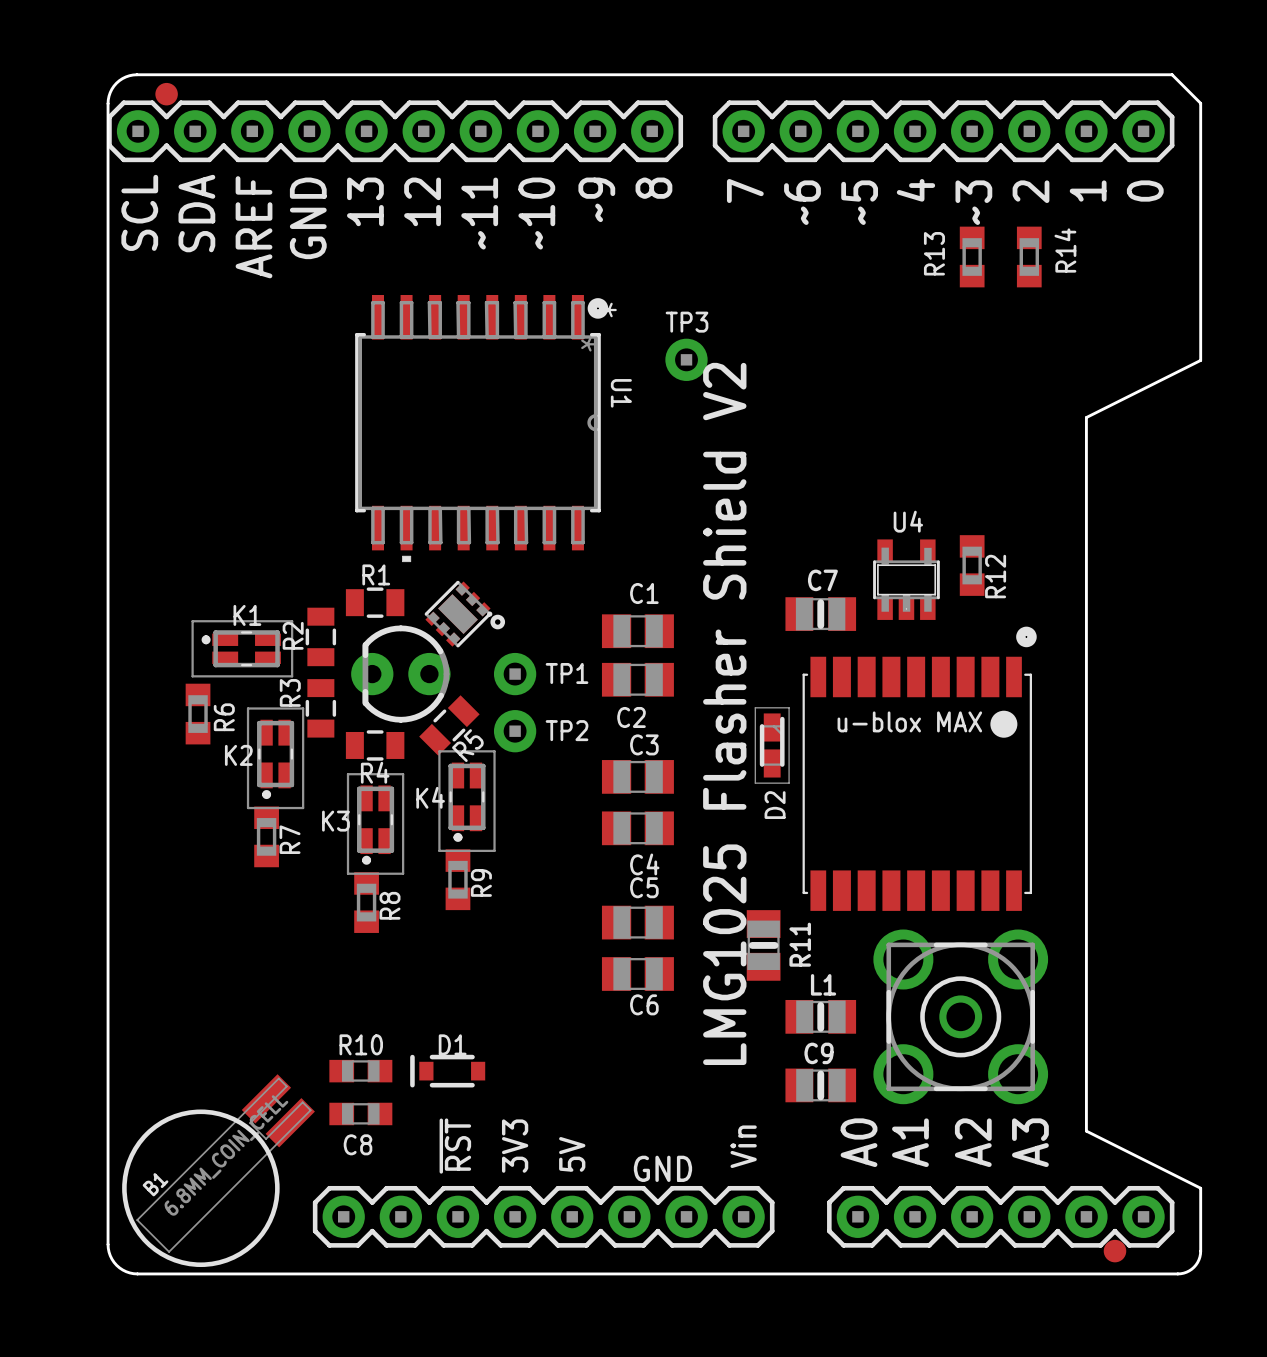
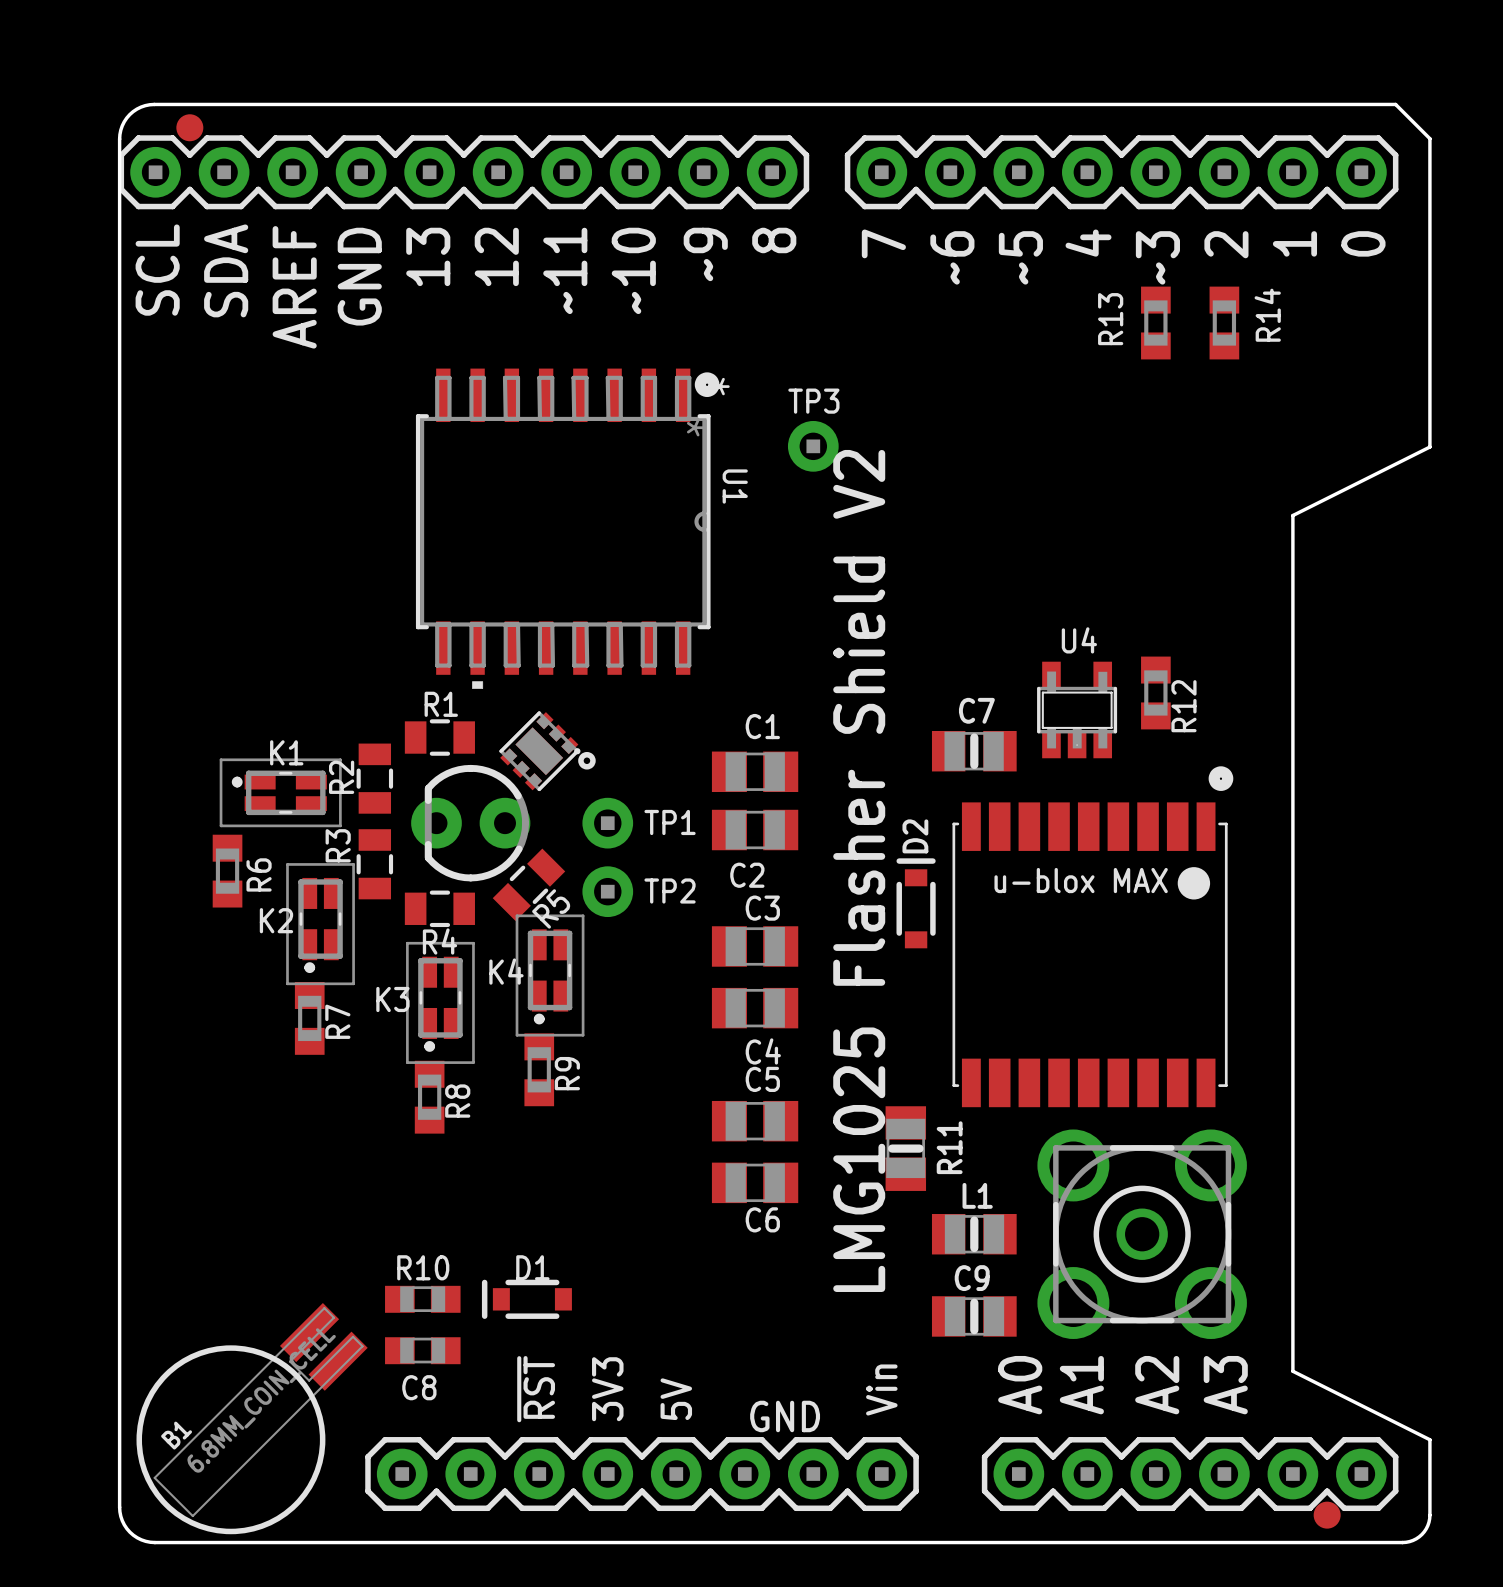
D2 footprint: [754, 707, 790, 784] -> [896, 858, 936, 949]
D2 name position: D2 (775, 805) -> D2 (915, 836)

